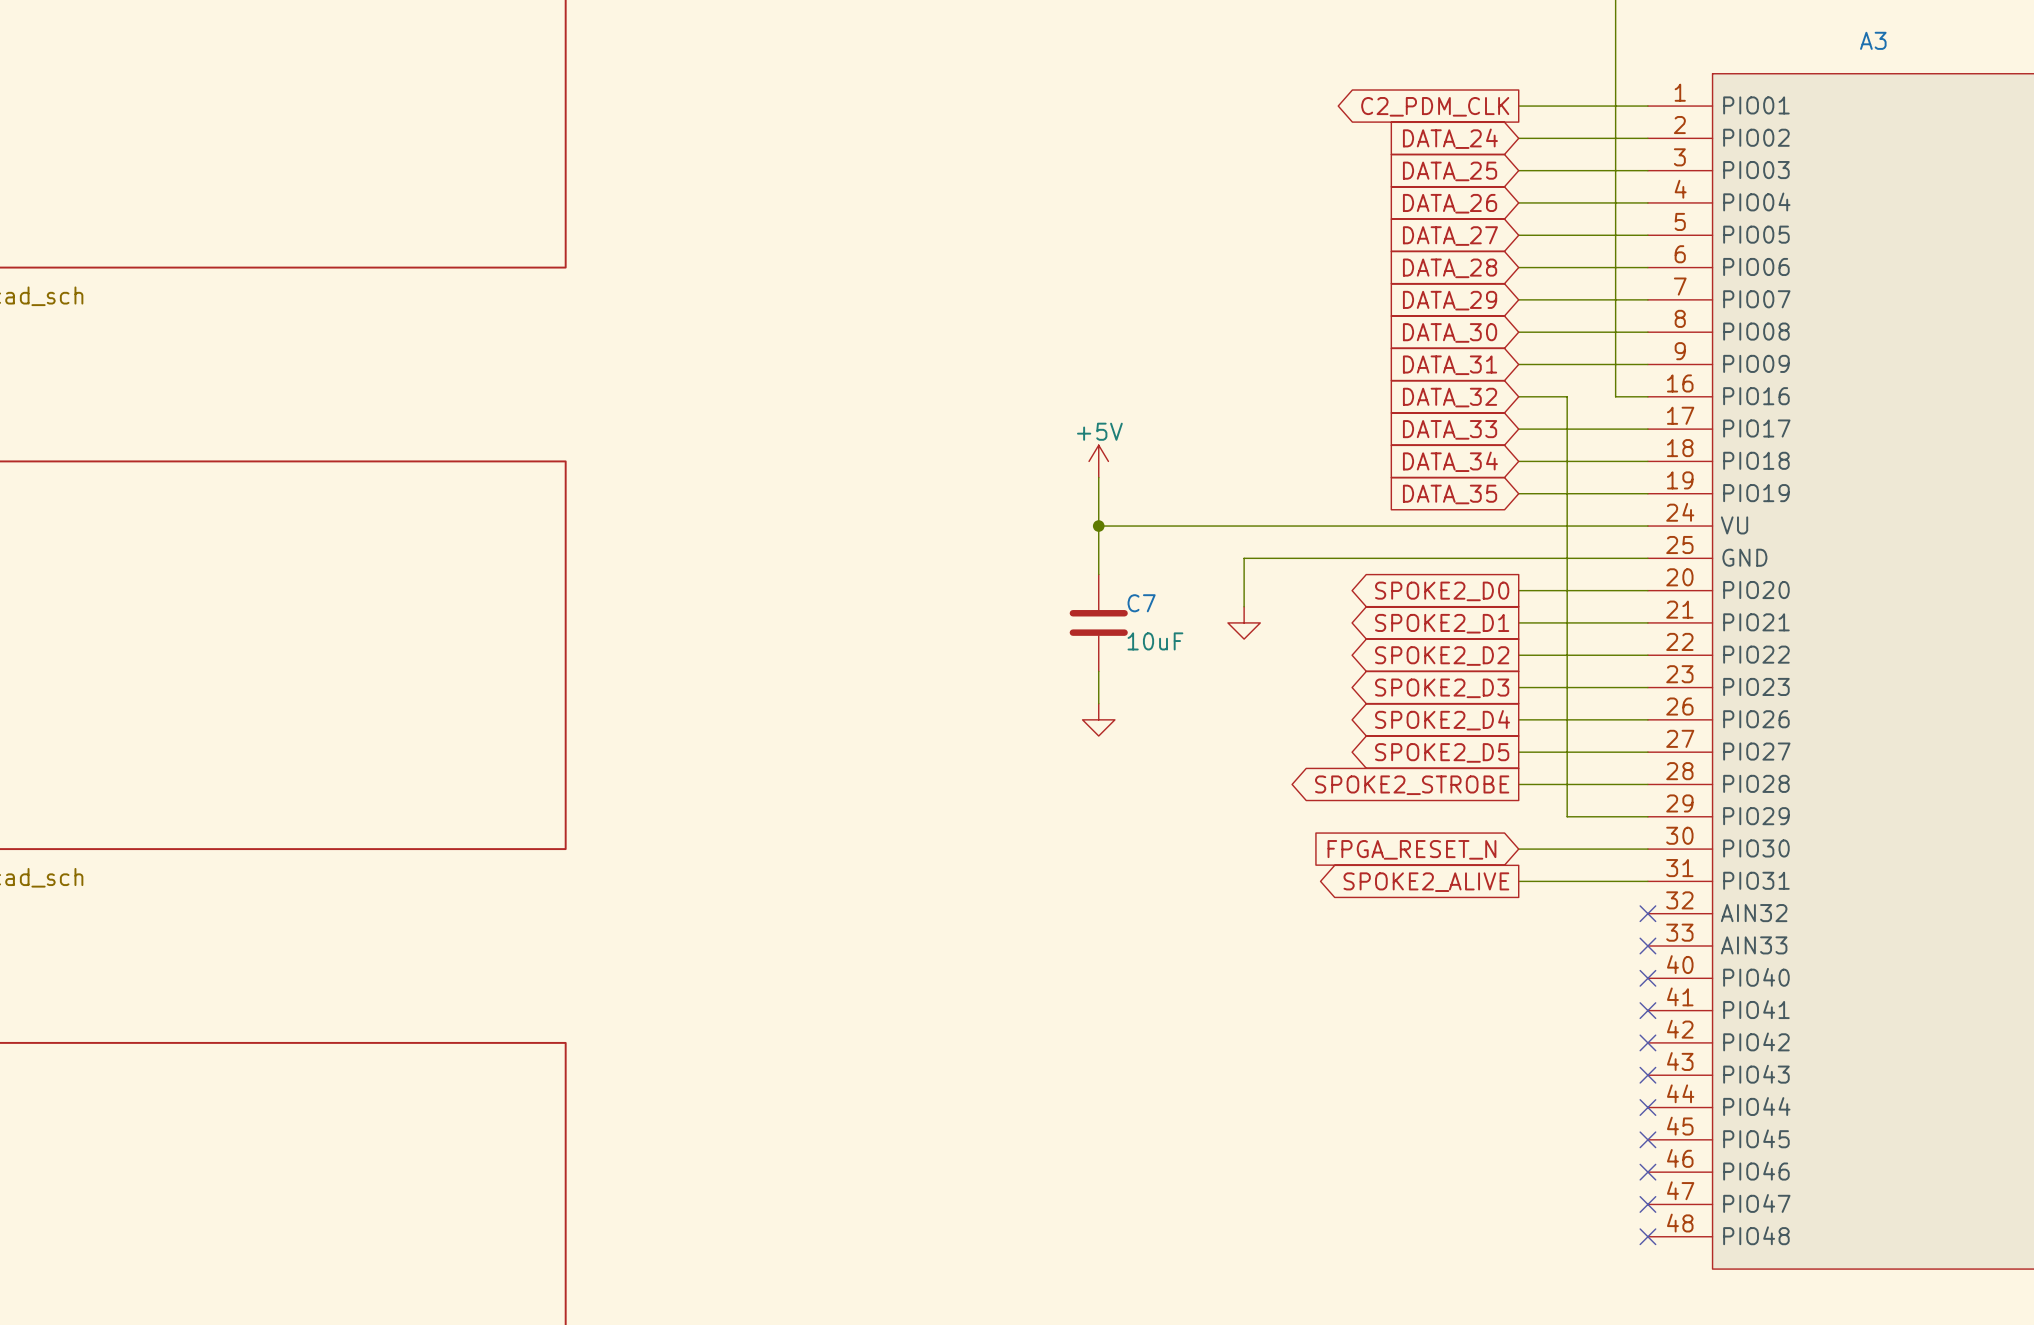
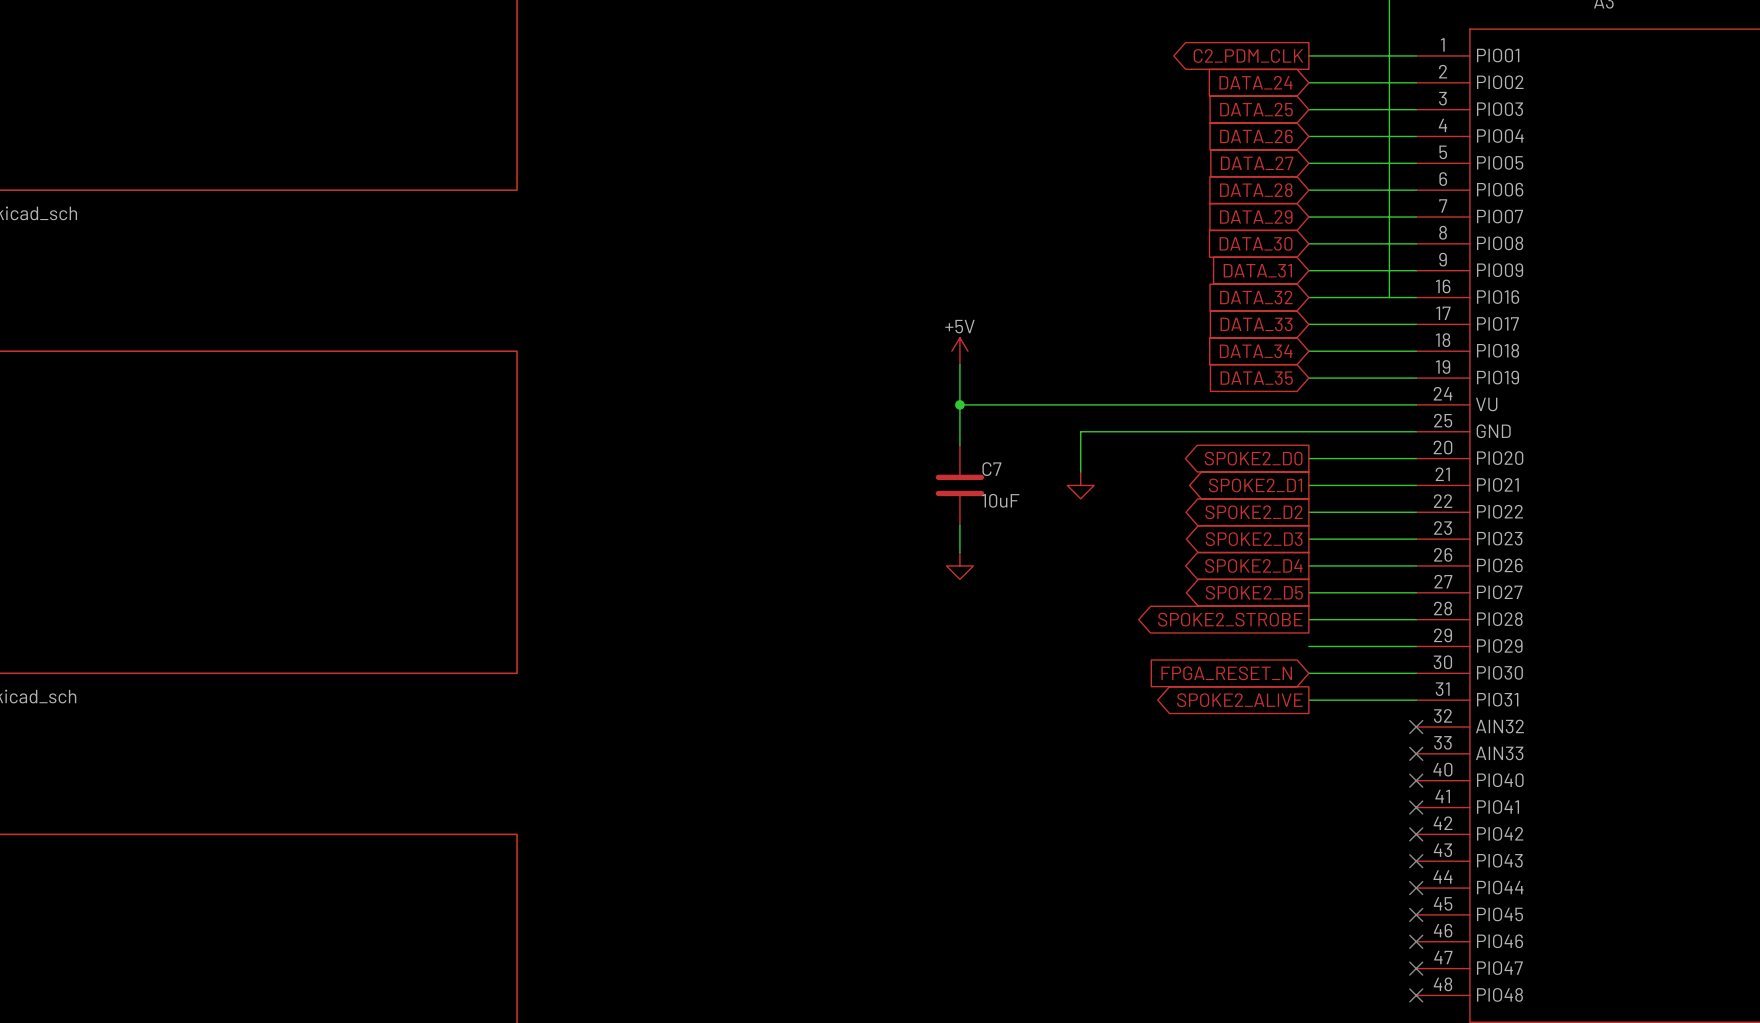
wire: (1567, 396) (1567, 816) -> (1349, 297) (1389, 297)
wire: none -> (1308, 646) (1349, 646)

